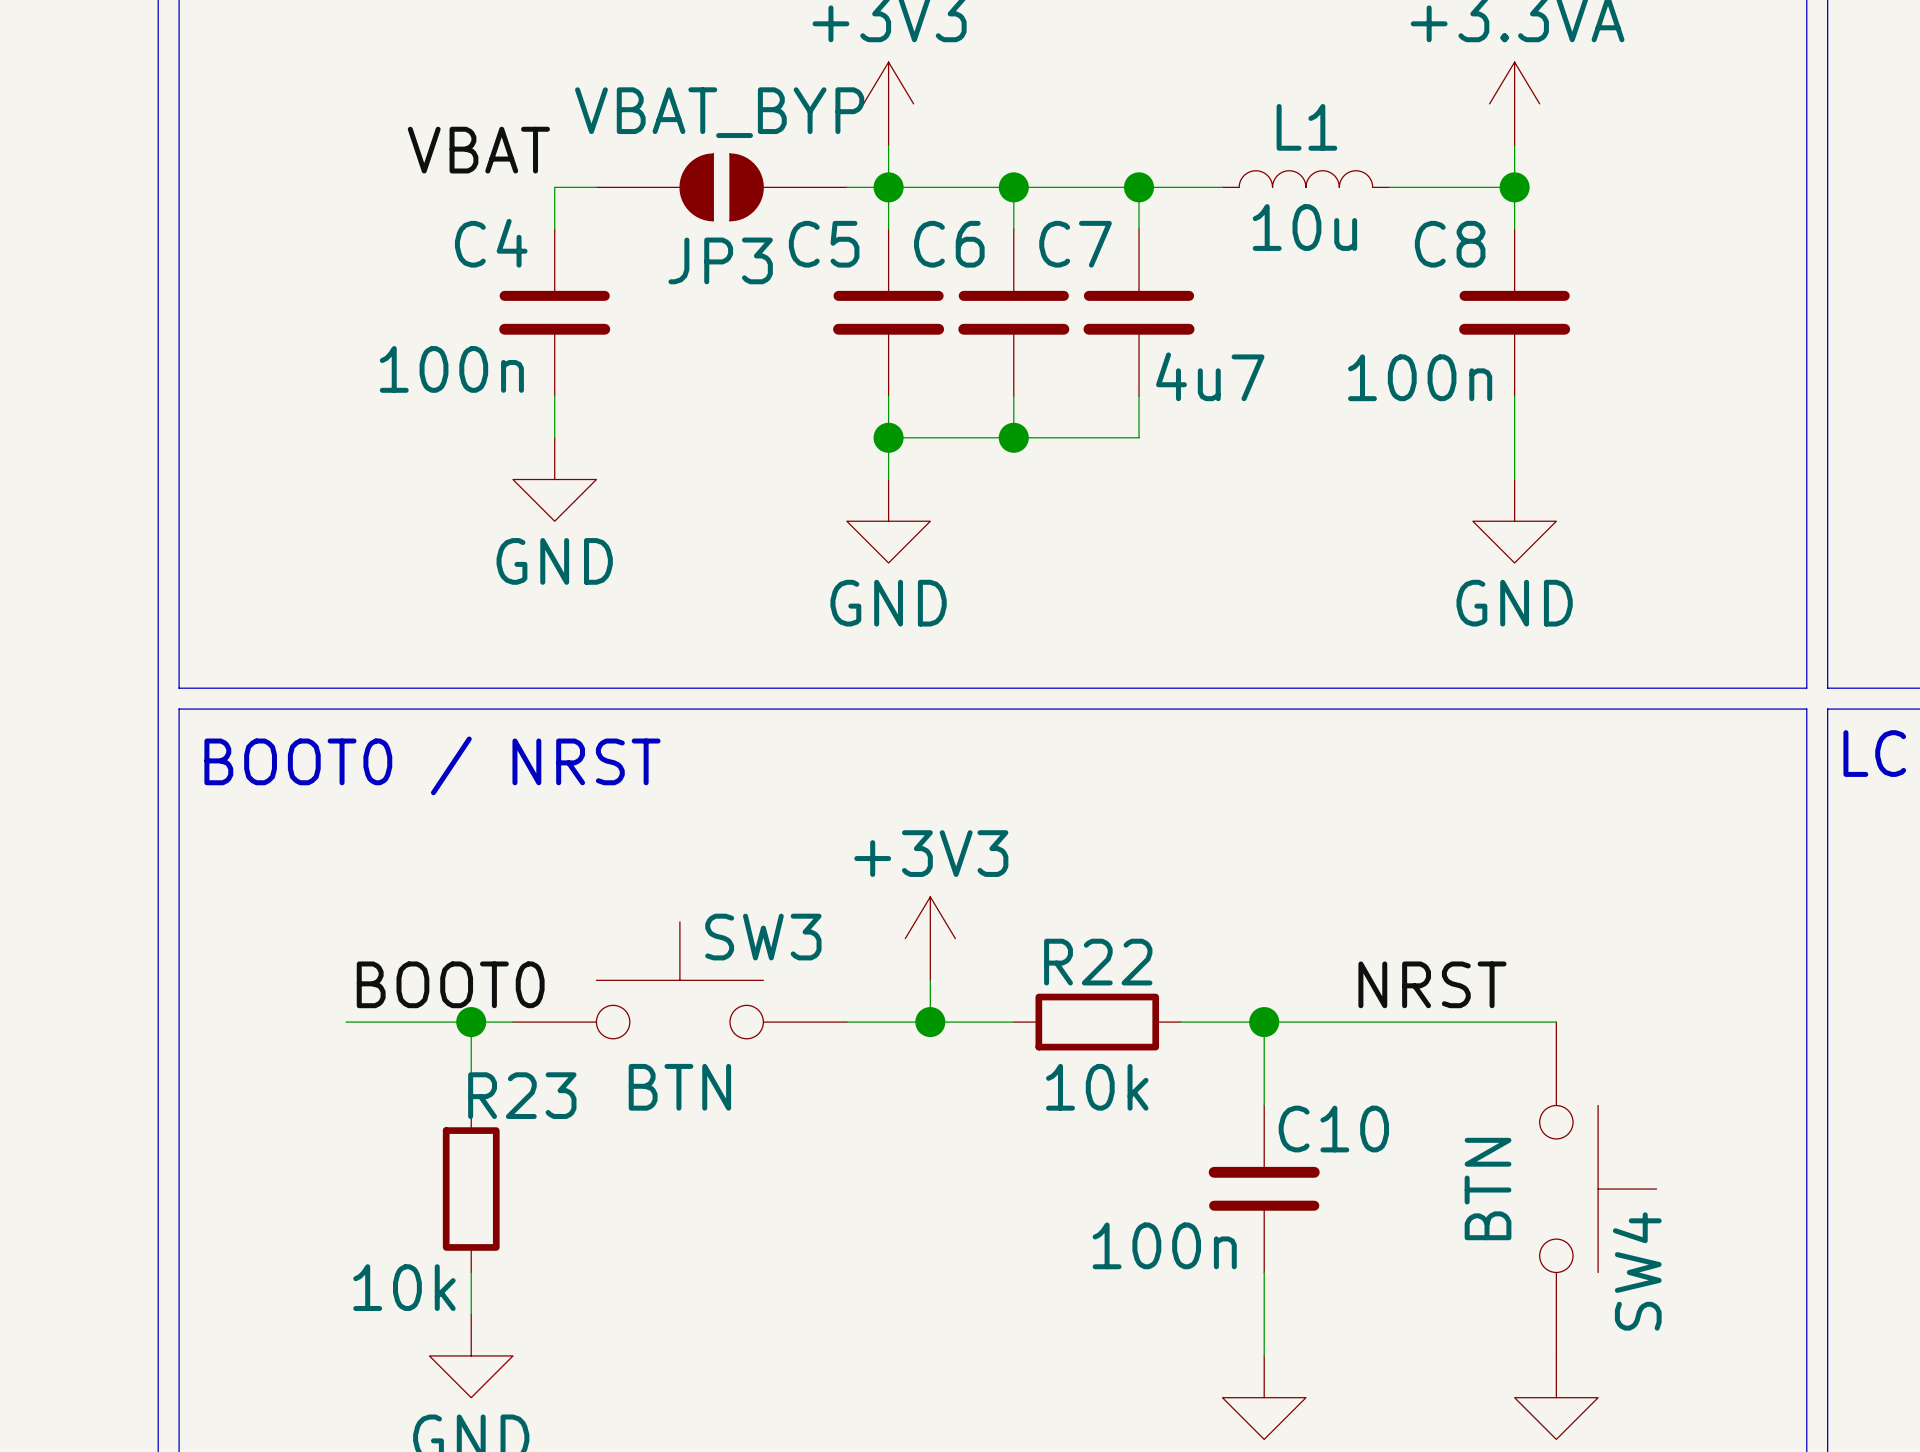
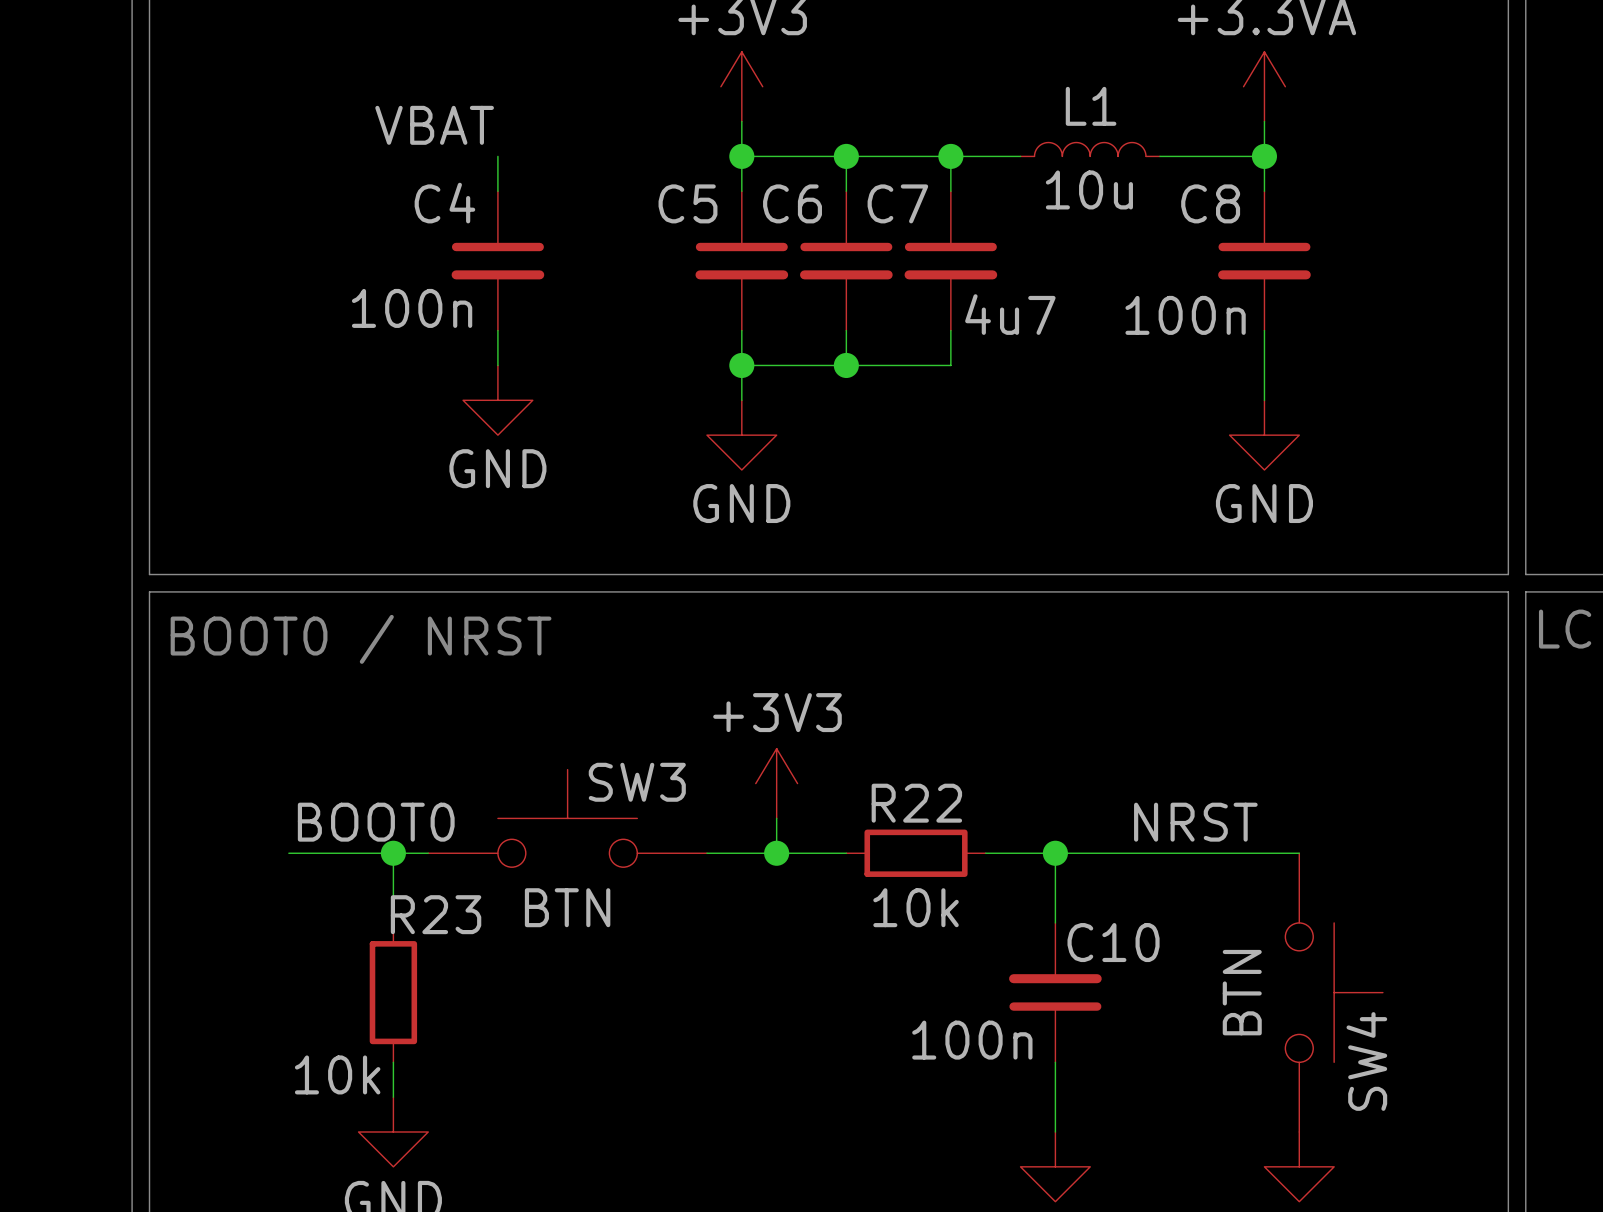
label position: VBAT (478, 150) -> VBAT (434, 125)
wire: (596, 187) (554, 187) (554, 229) -> (497, 156) (497, 191)
JP3: VBAT_BYP (721, 187) -> none
wire: (846, 187) (888, 187) -> none
C4 position: (554, 312) -> (497, 260)
wire: (554, 396) (554, 437) -> (497, 330) (497, 365)
power symbol position: GND (554, 479) -> GND (497, 400)

